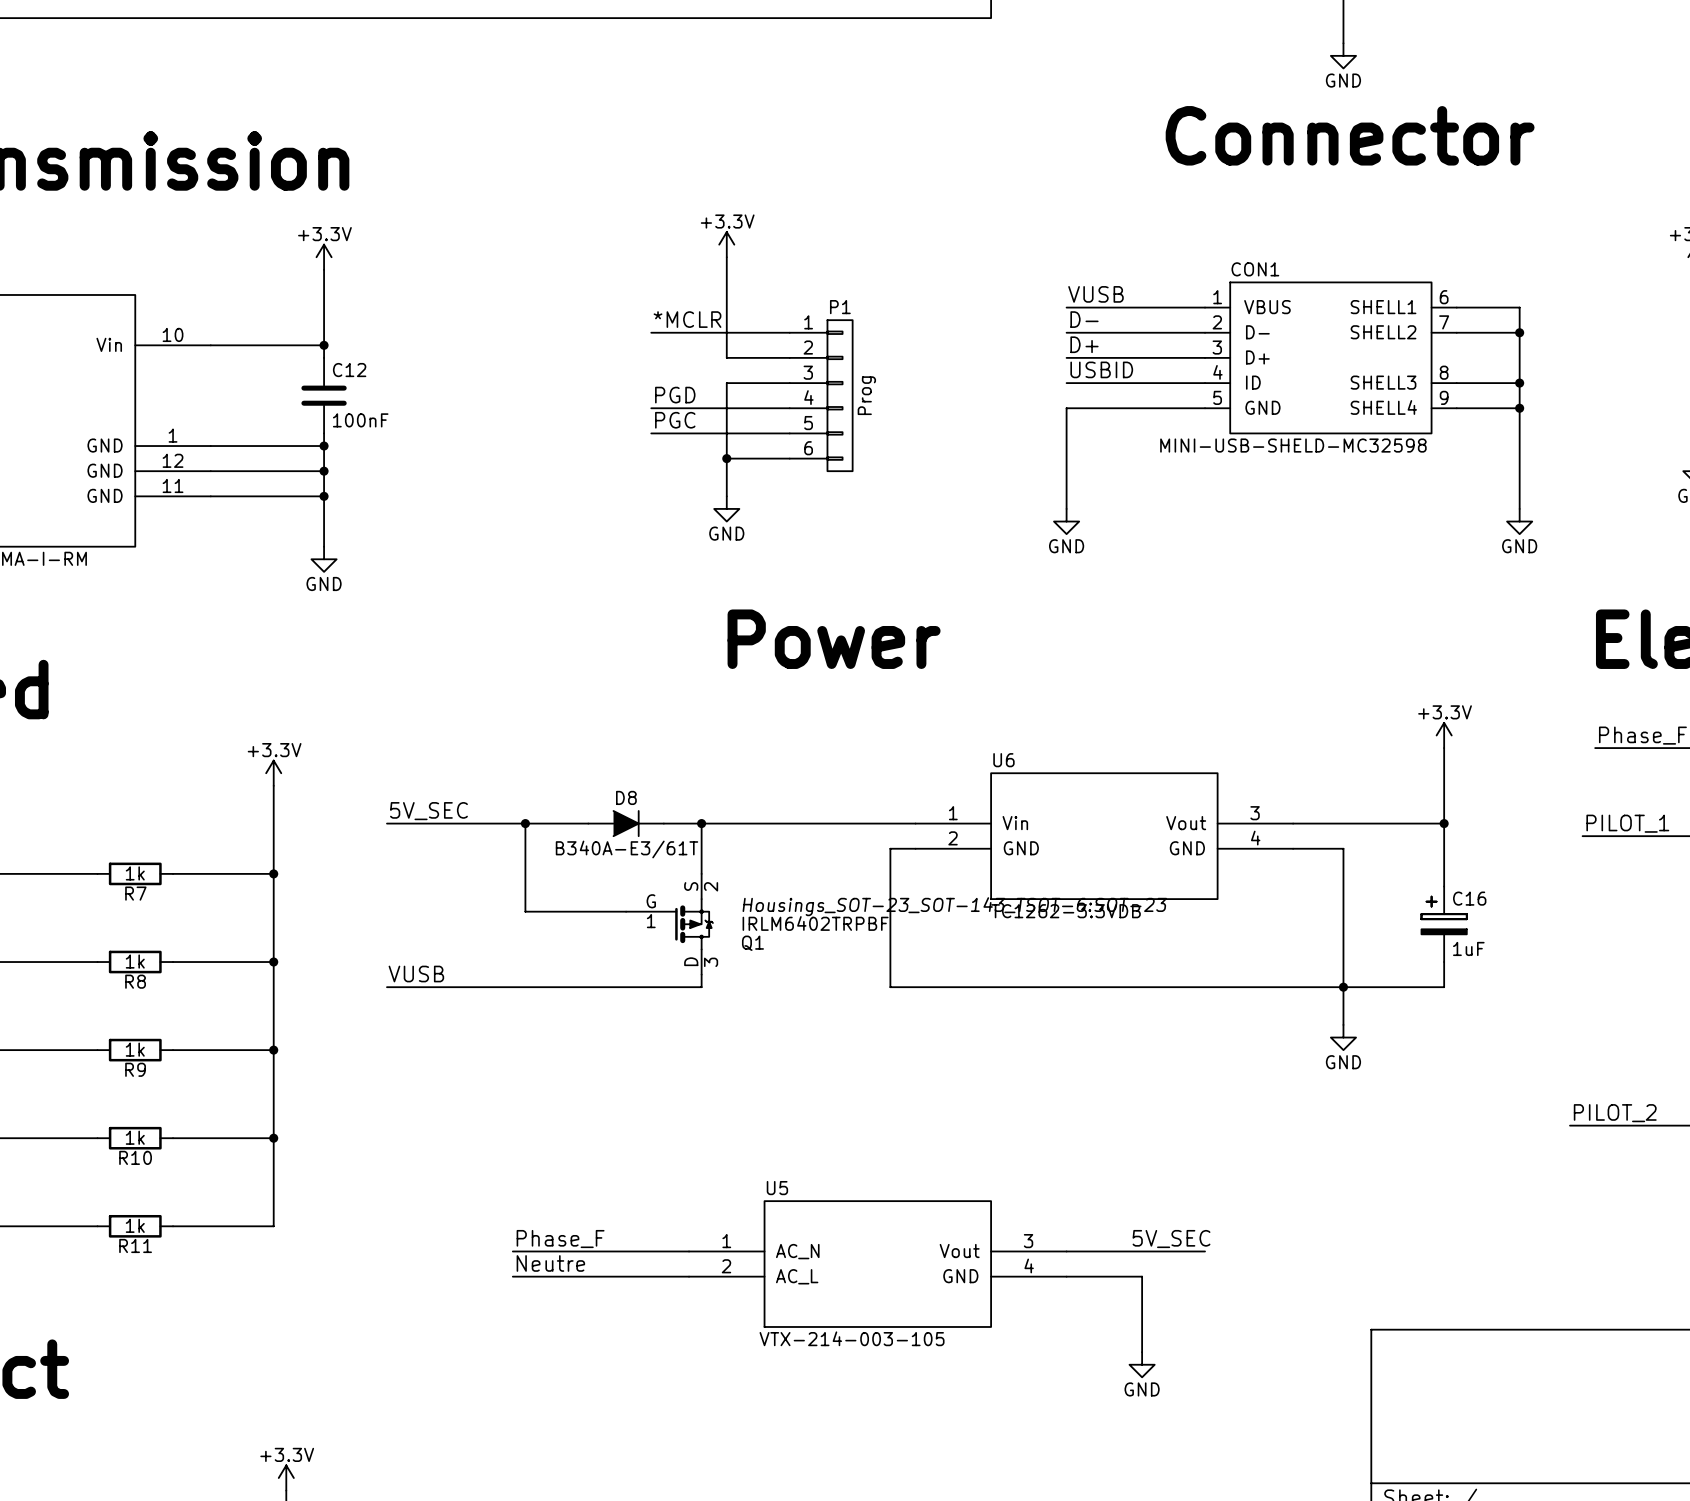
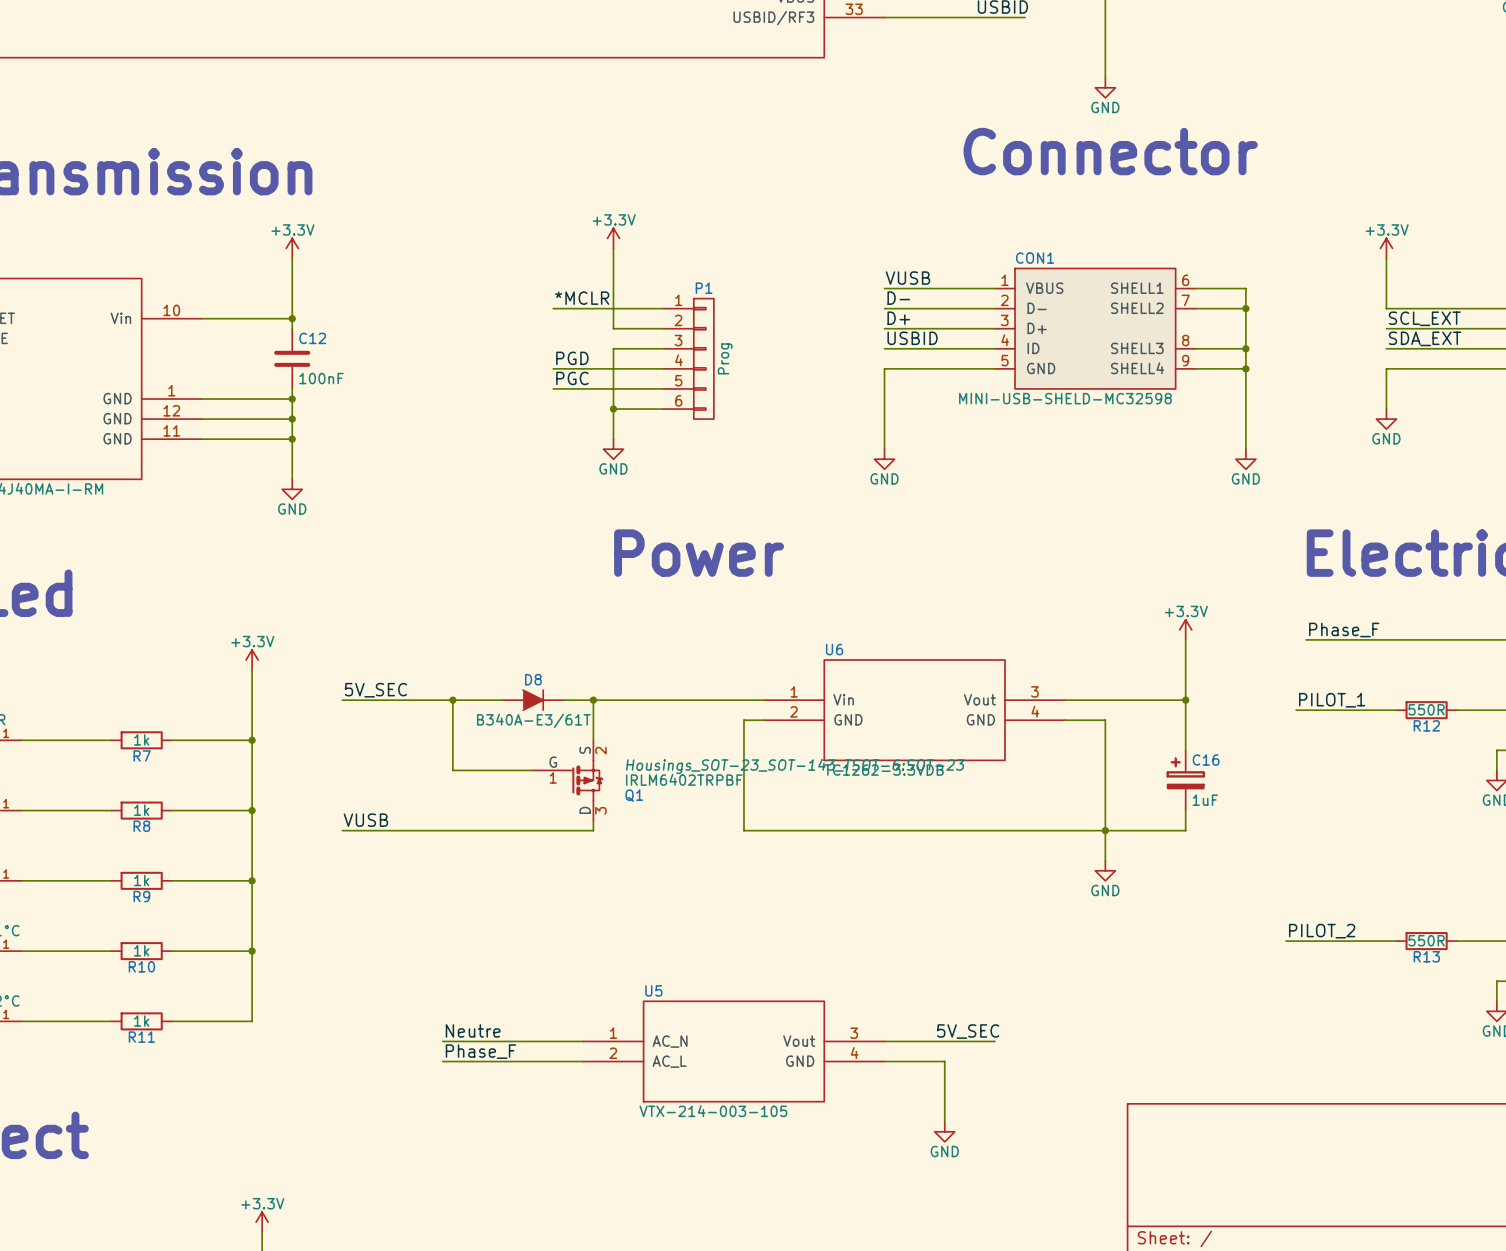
label: Phase_F (560, 1239) -> Neutre (473, 1030)
label: Neutre (550, 1263) -> Phase_F (480, 1051)

